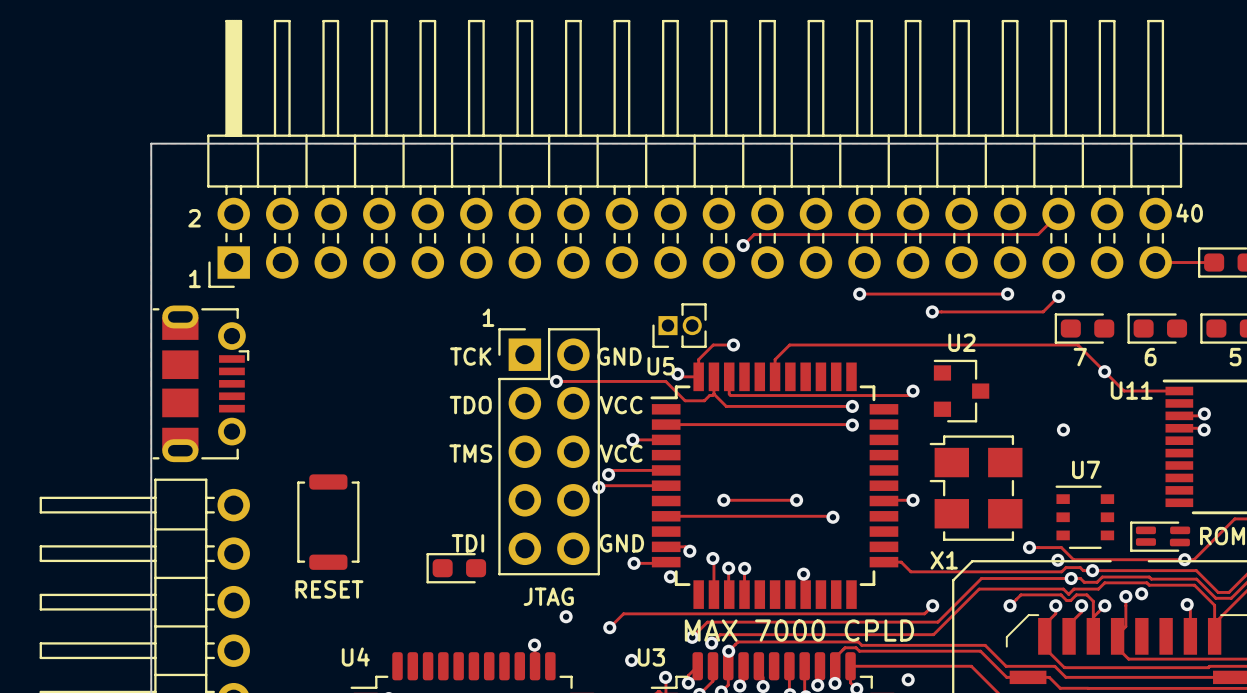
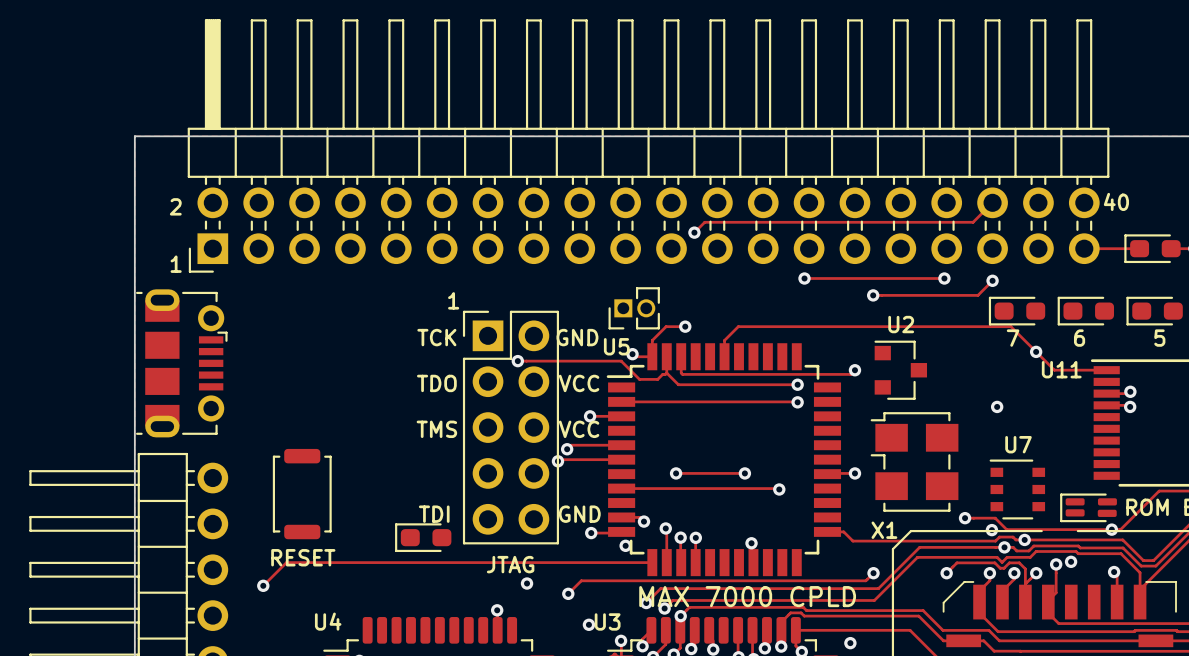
track: none -> (652, 562) (286, 562) (263, 585)
via: none -> (263, 585)

